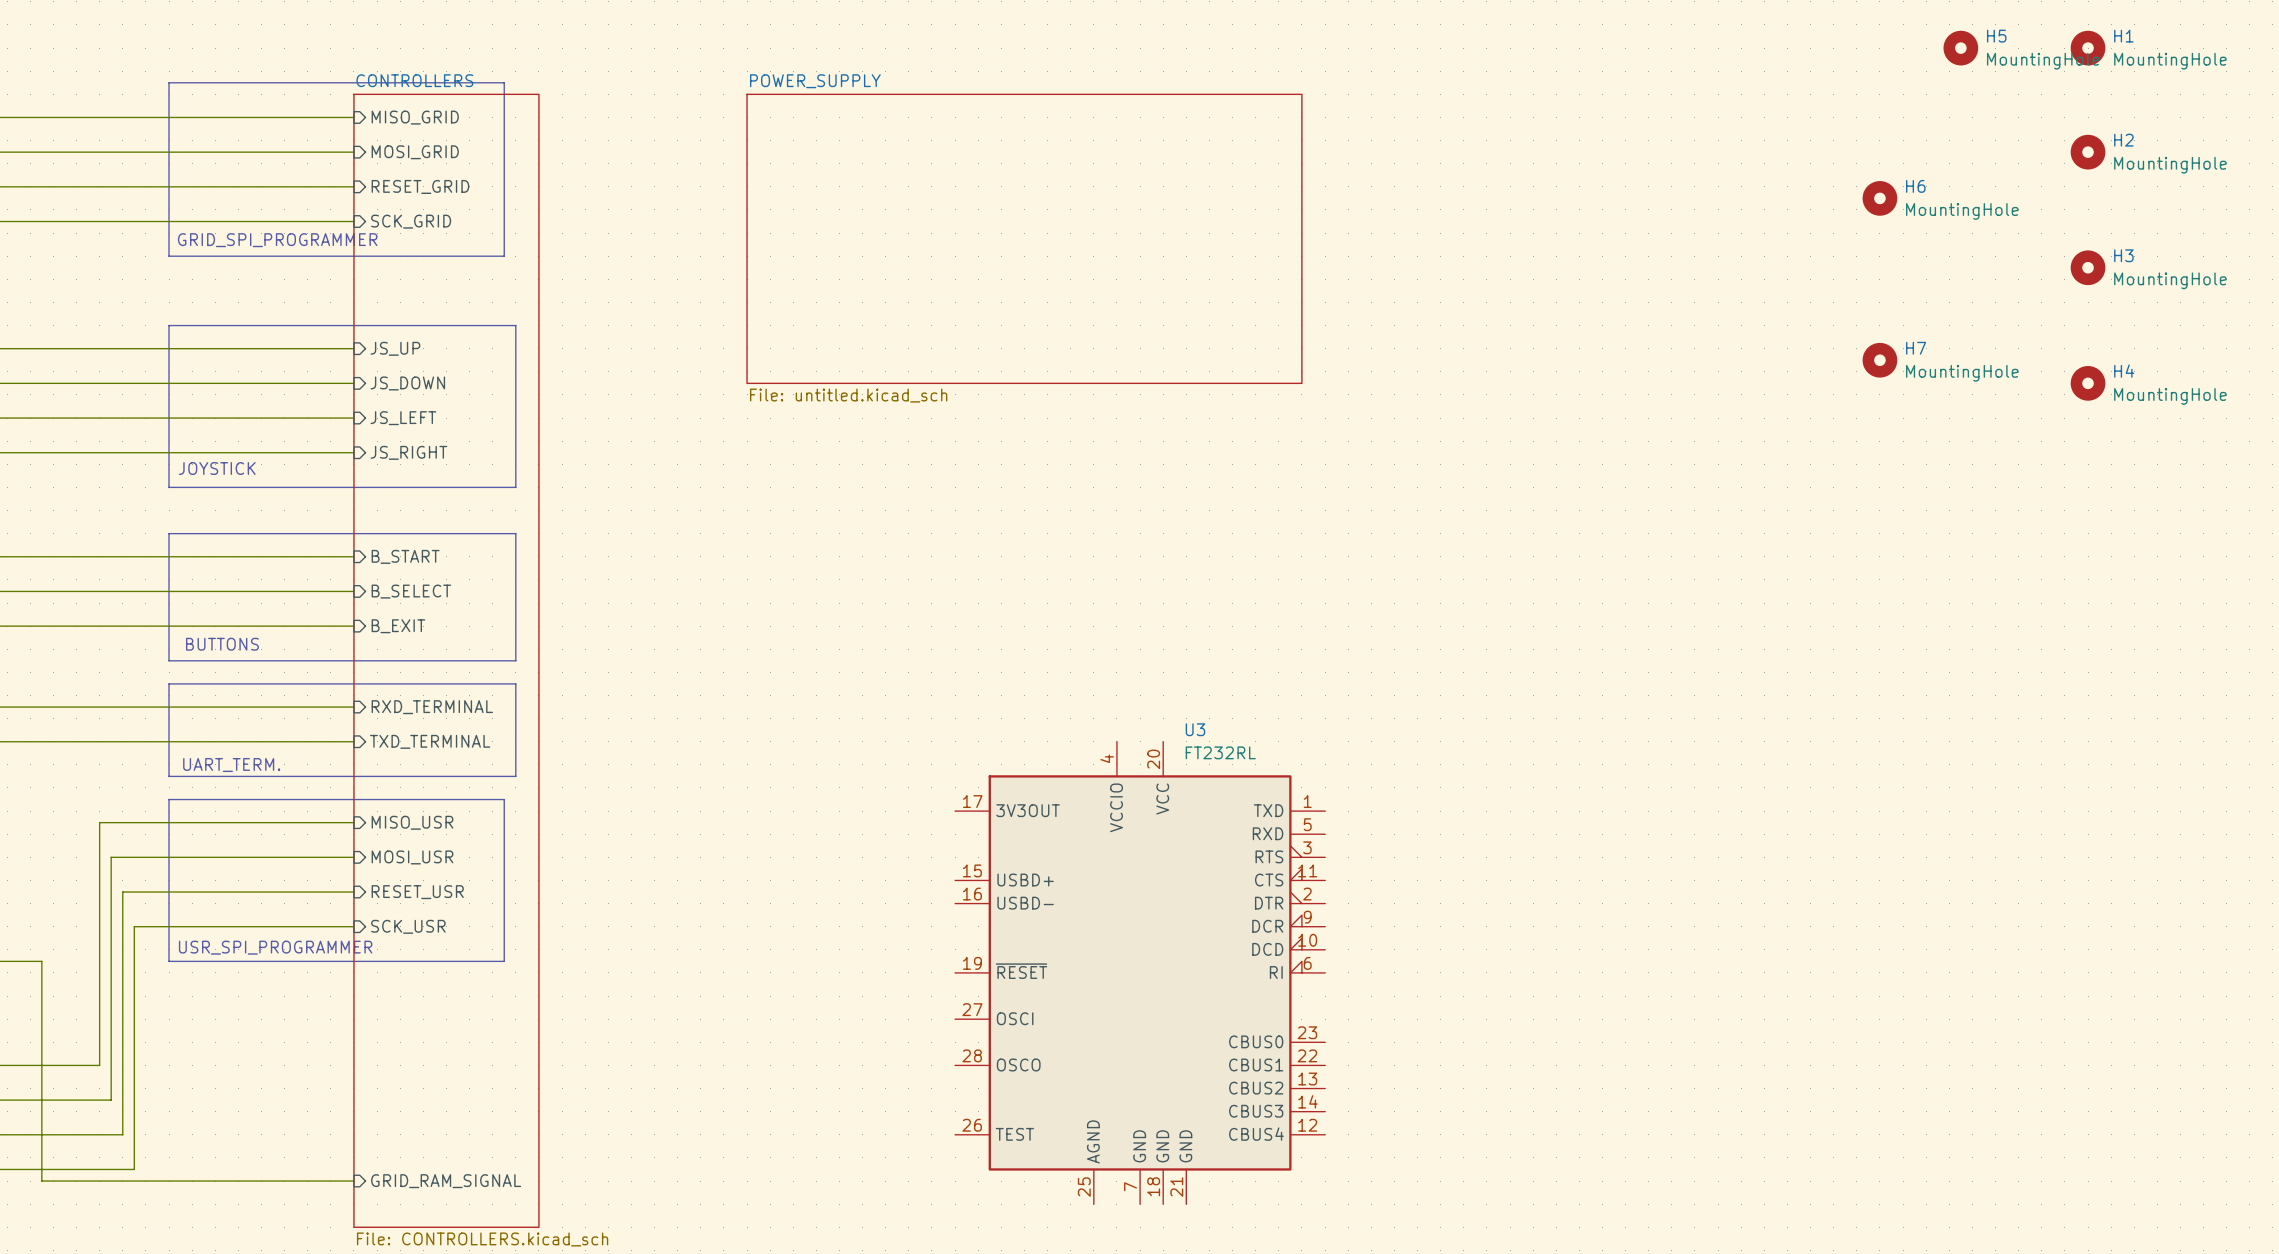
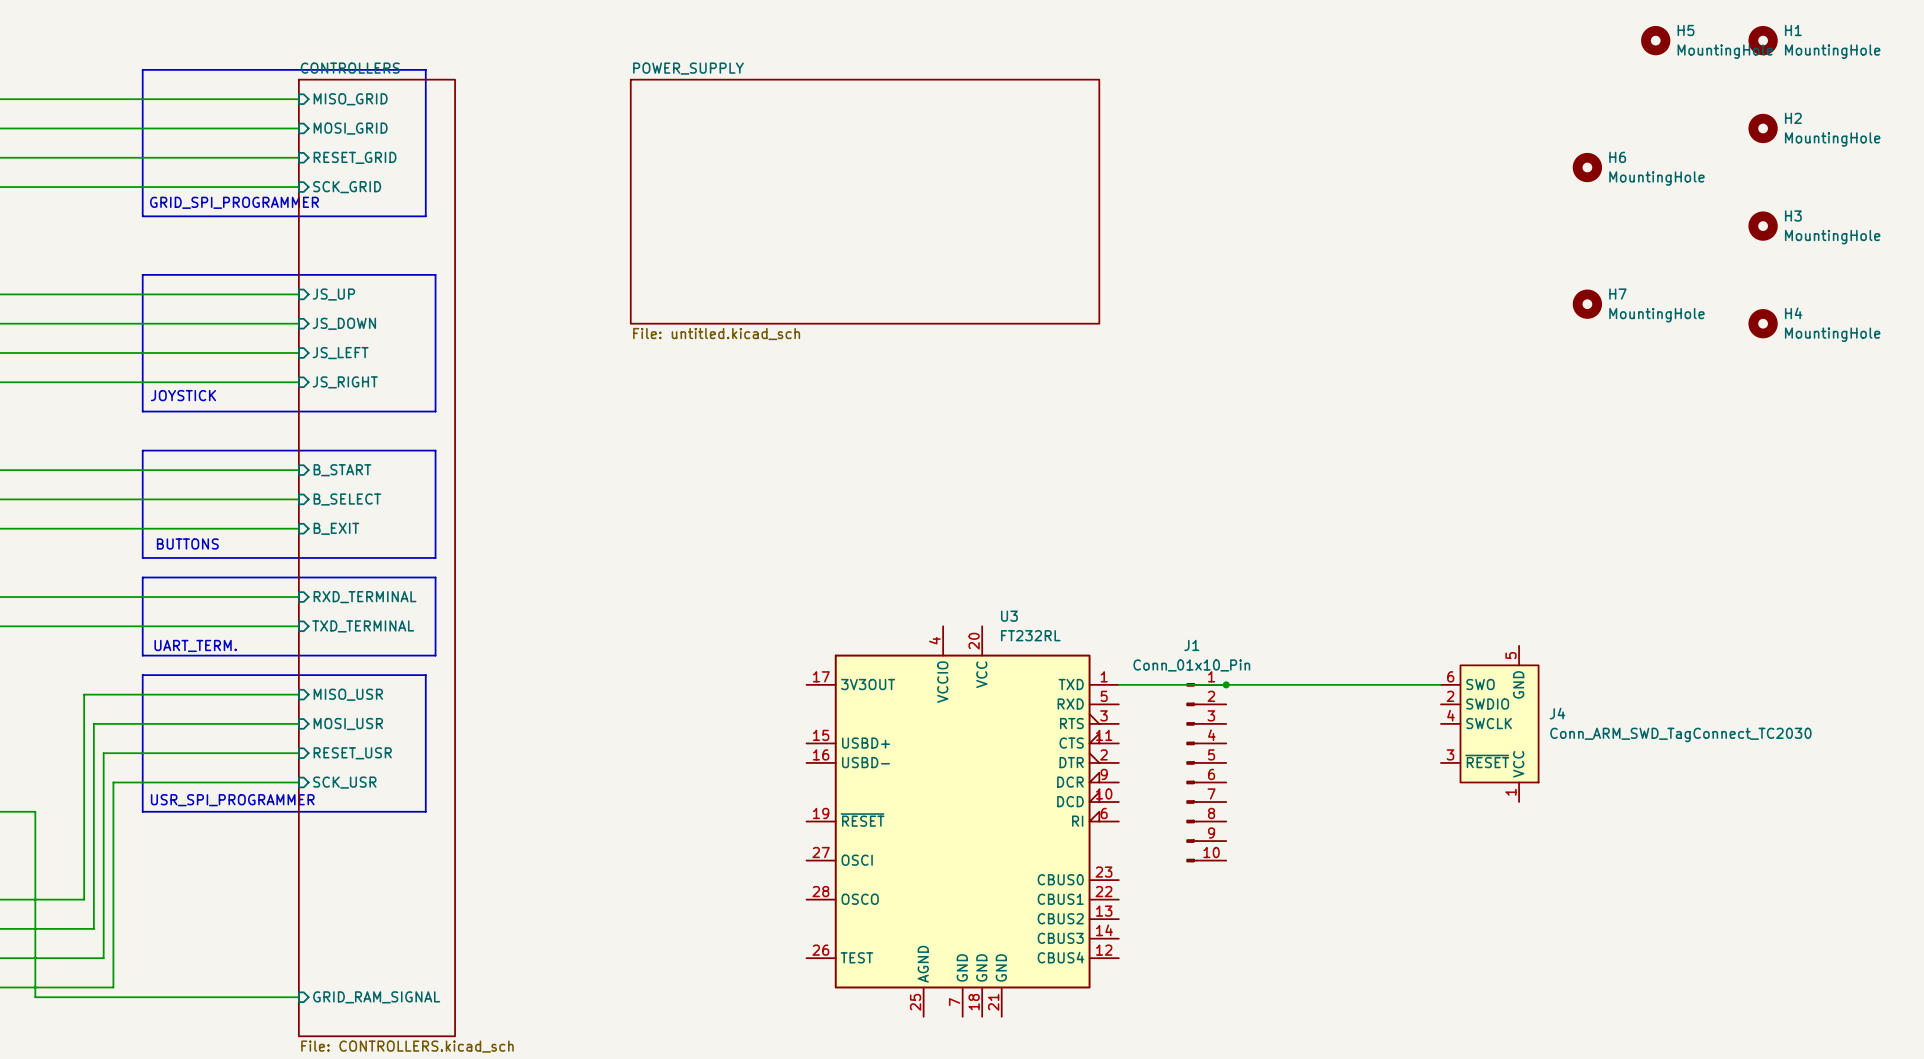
wire: none -> (1118, 684) (1440, 684)
junction: none -> (1226, 684)
J4: none -> Conn_ARM_SWD_TagConnect_TC2030 (1489, 723)
J1: none -> Conn_01x10_Pin (1206, 772)

